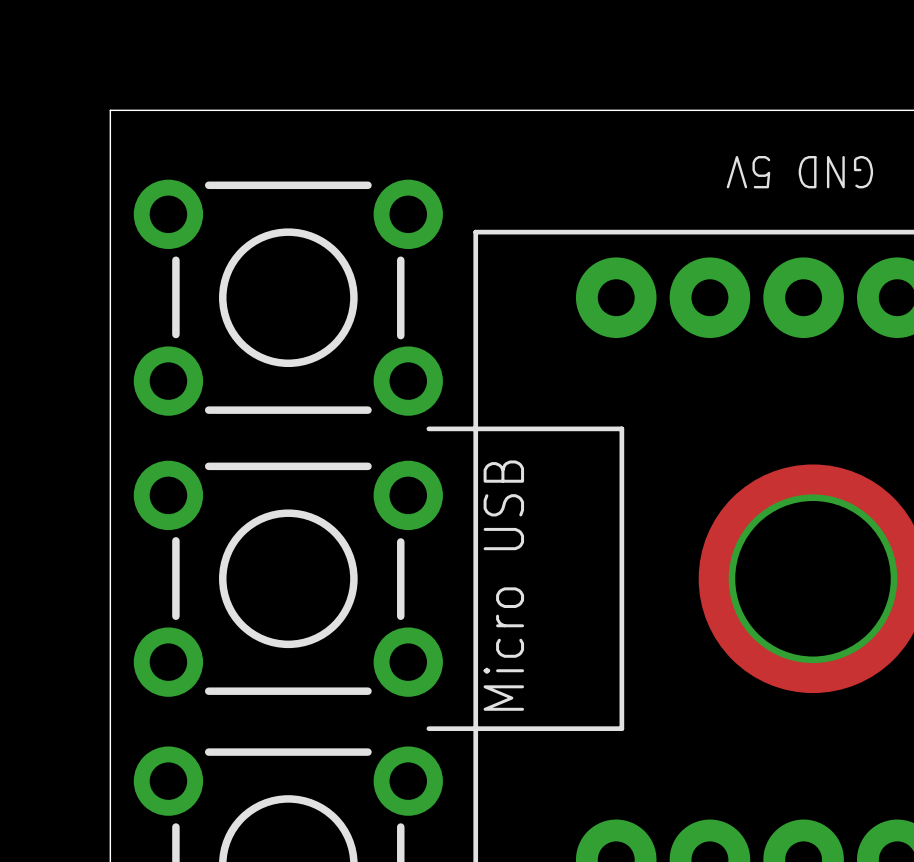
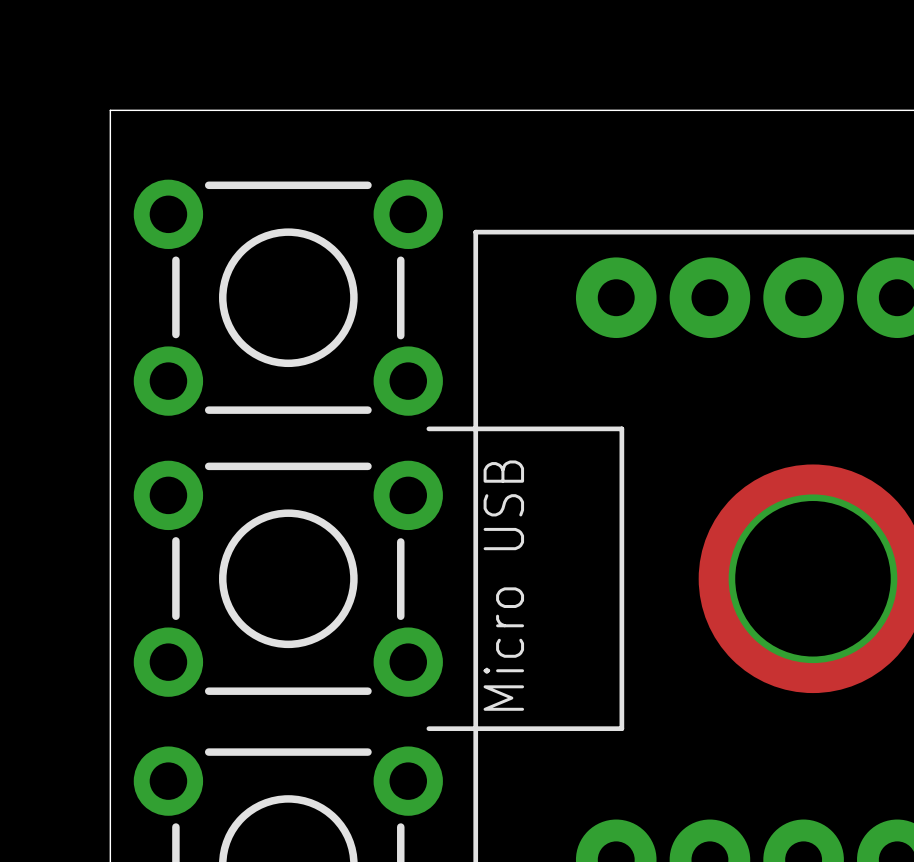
text: GND 5V (799, 172) -> none

